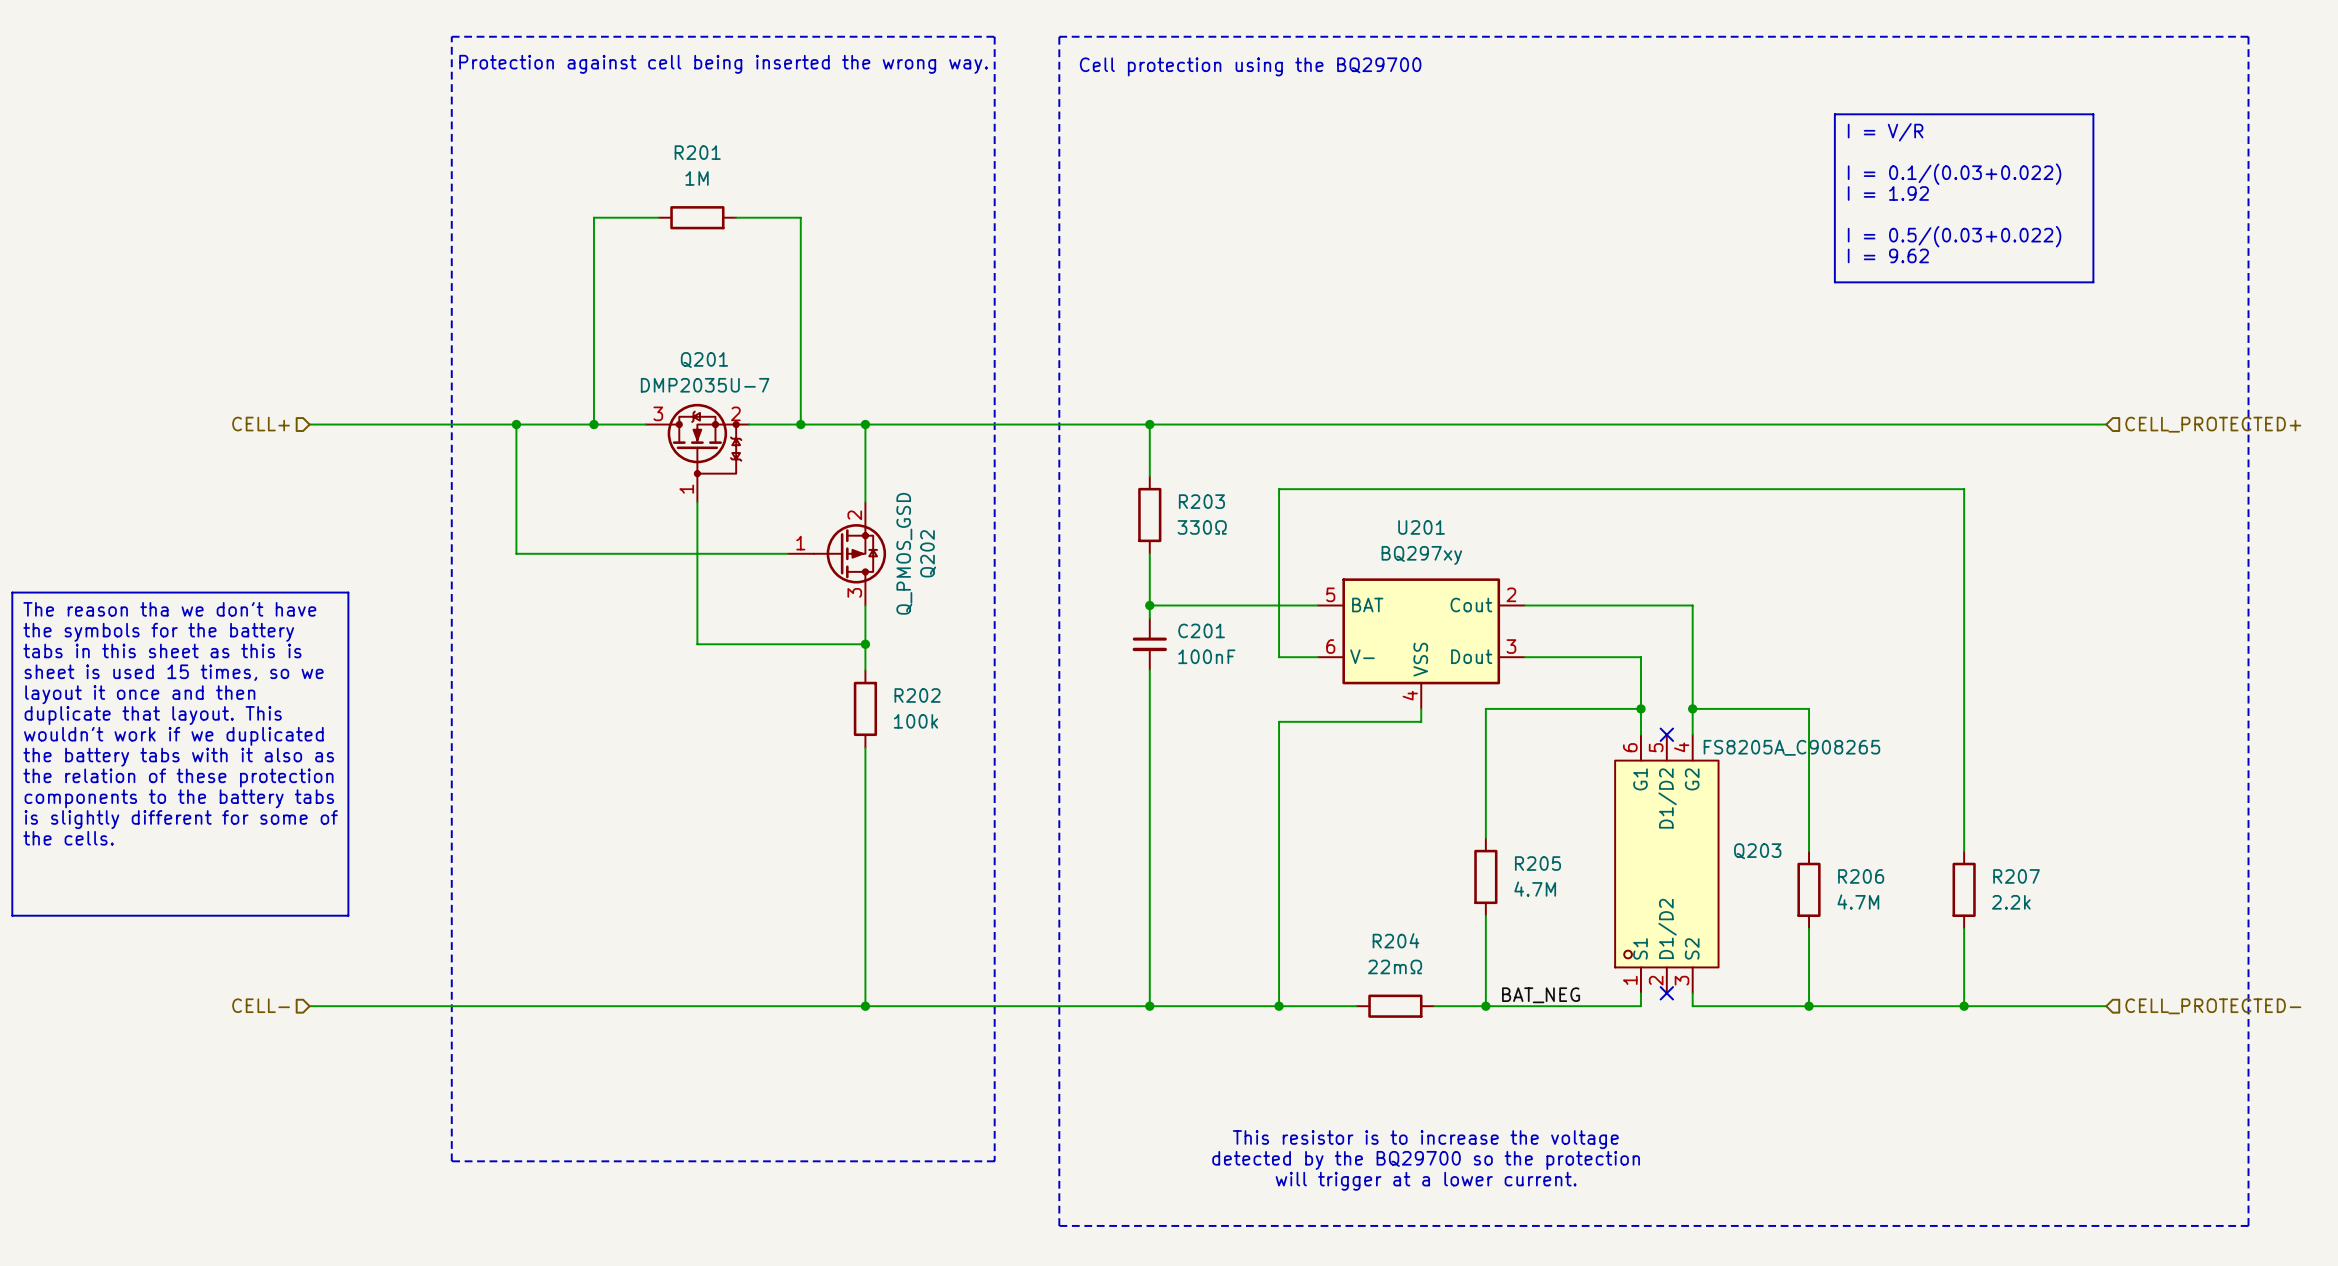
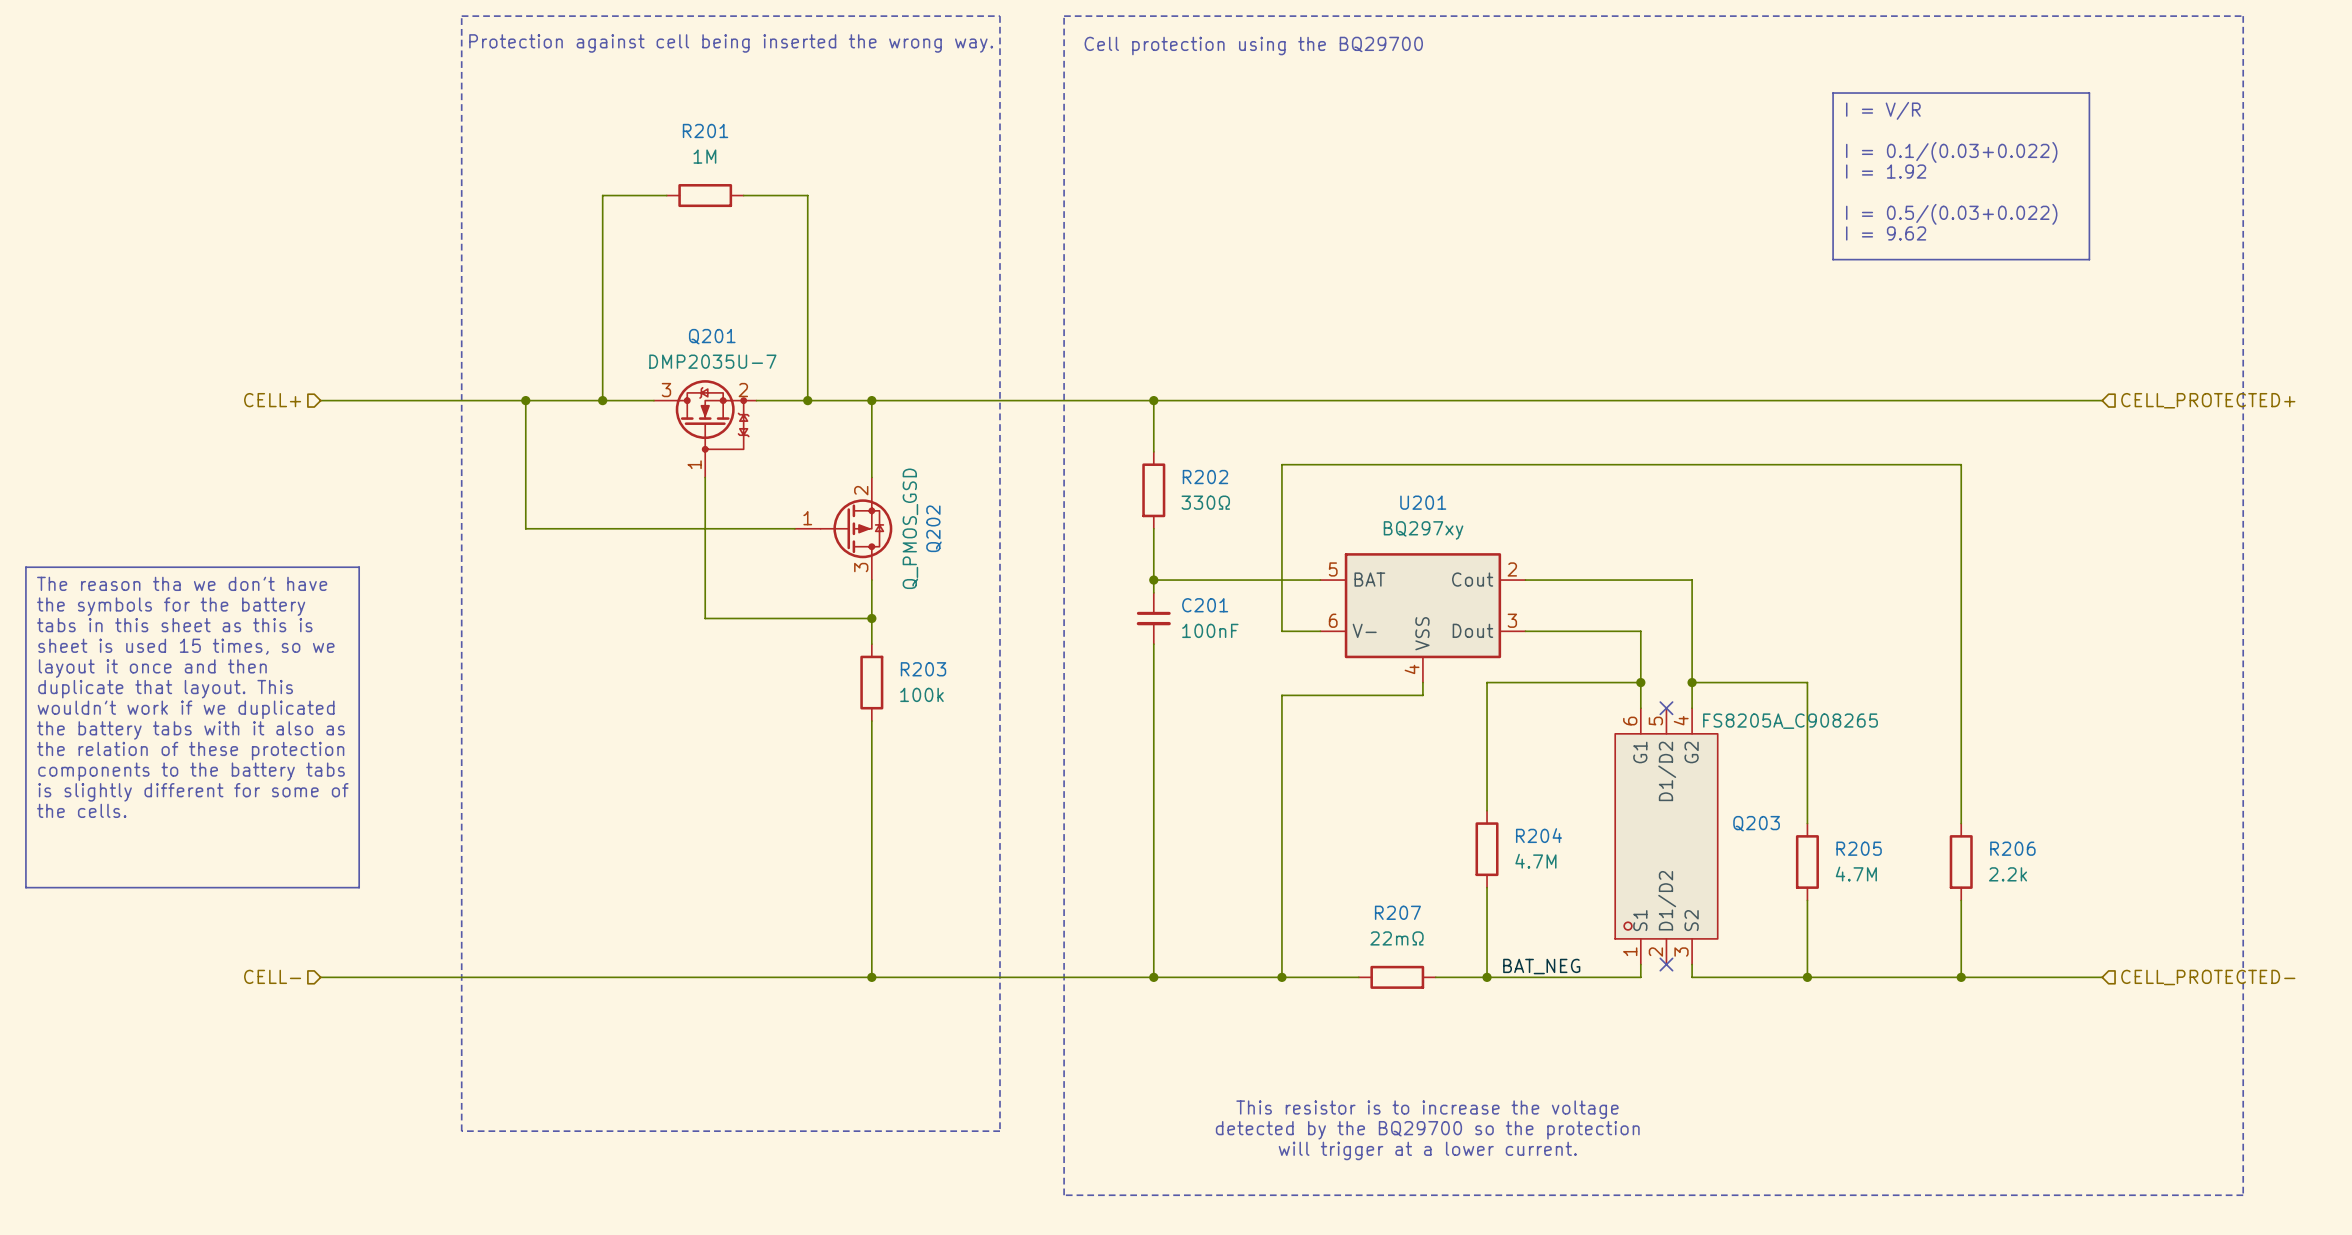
R203 name: R203 (1201, 501) -> R202 (1205, 477)
R202 name: R202 (917, 695) -> R203 (923, 669)
R205 name: R205 (1537, 863) -> R204 (1538, 835)
R206 name: R206 (1861, 876) -> R205 (1859, 848)
R207 name: R207 (2016, 876) -> R206 (2012, 848)
R204 name: R204 (1396, 940) -> R207 (1397, 912)

